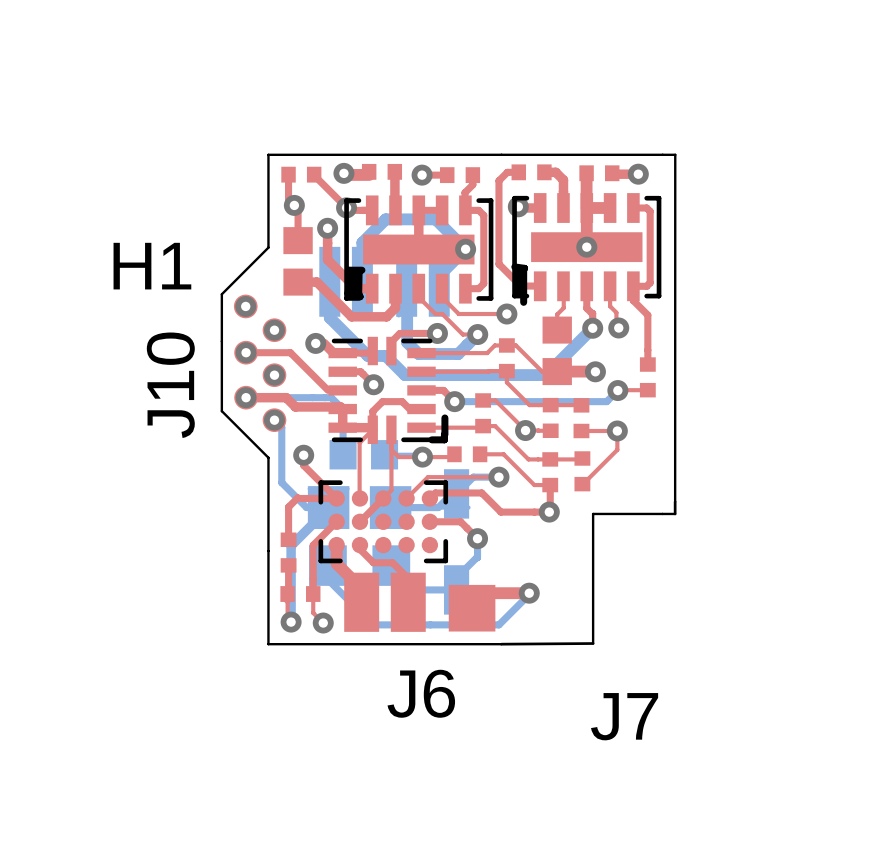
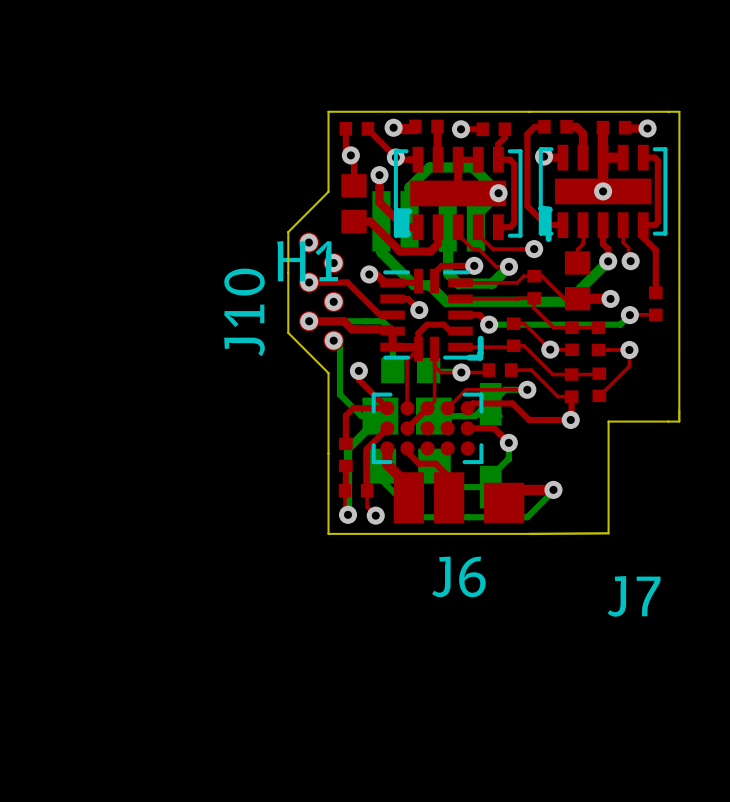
H1 name position: H1 (152, 266) -> H1 (307, 261)

